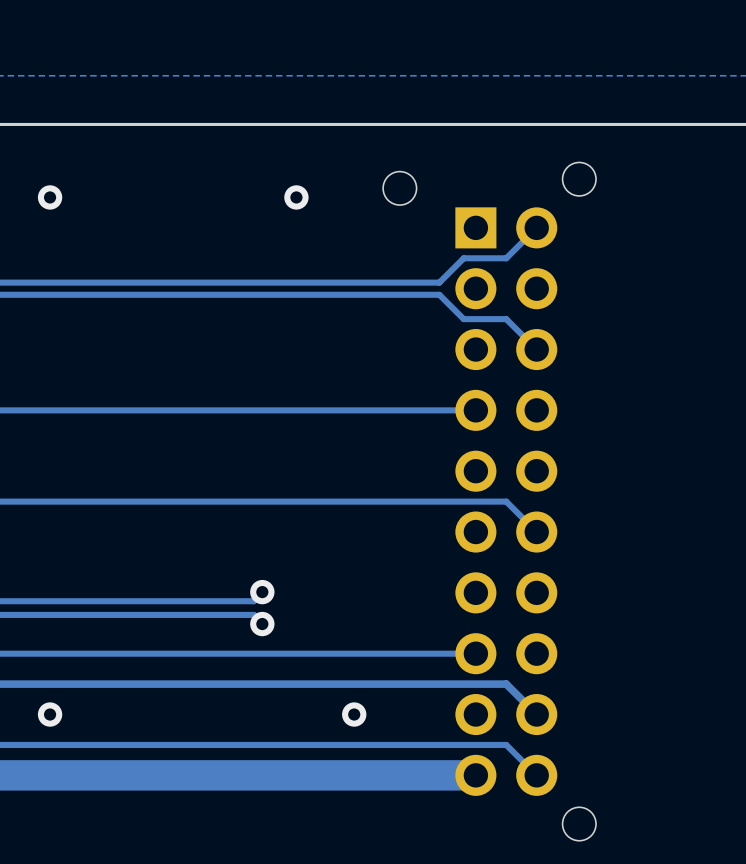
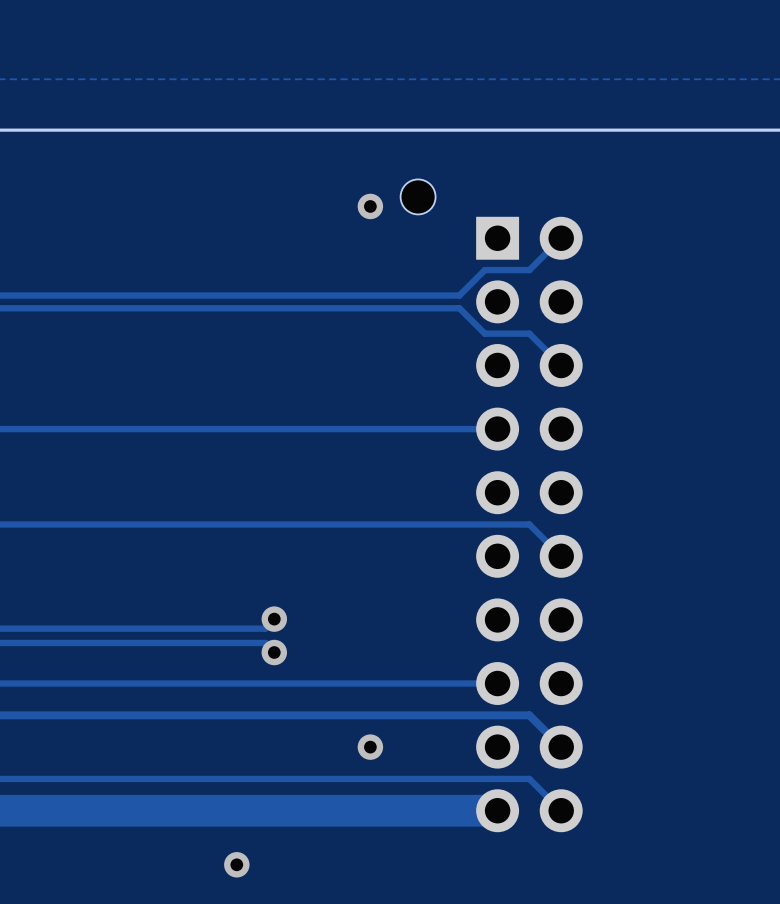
part footprint: [383, 162, 597, 841] -> [476, 216, 583, 833]
via: (50, 197) -> none
via position: (296, 197) -> (370, 206)
via: (50, 714) -> none
via: none -> (236, 864)

